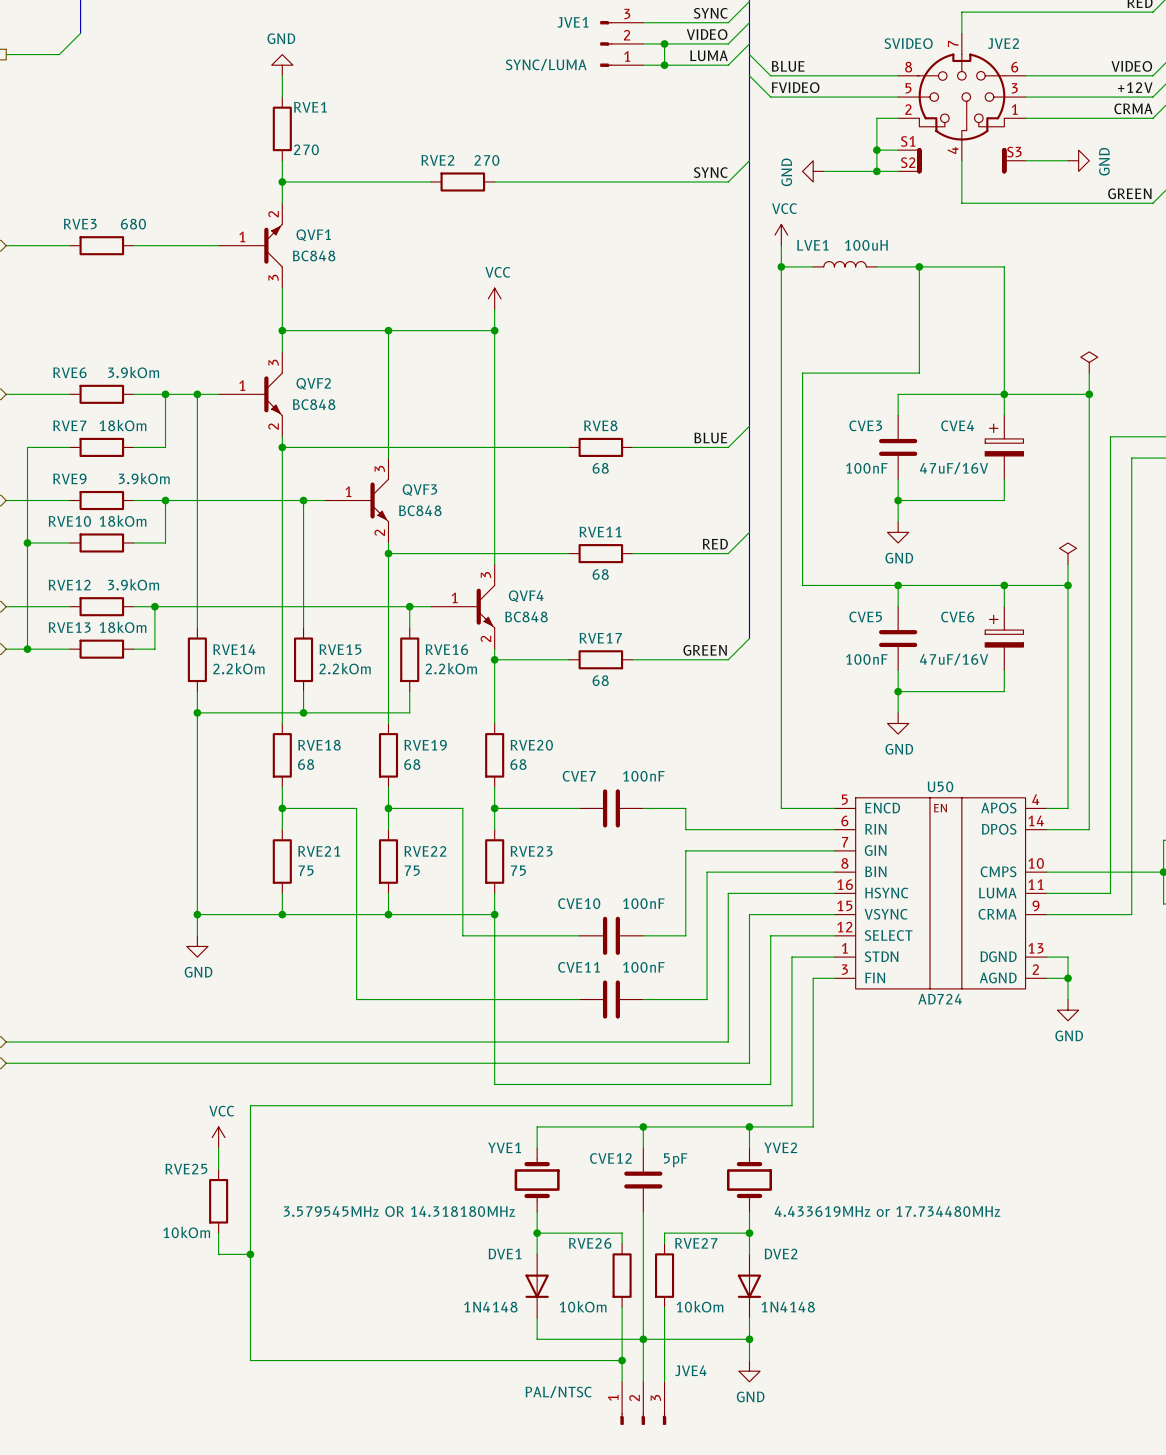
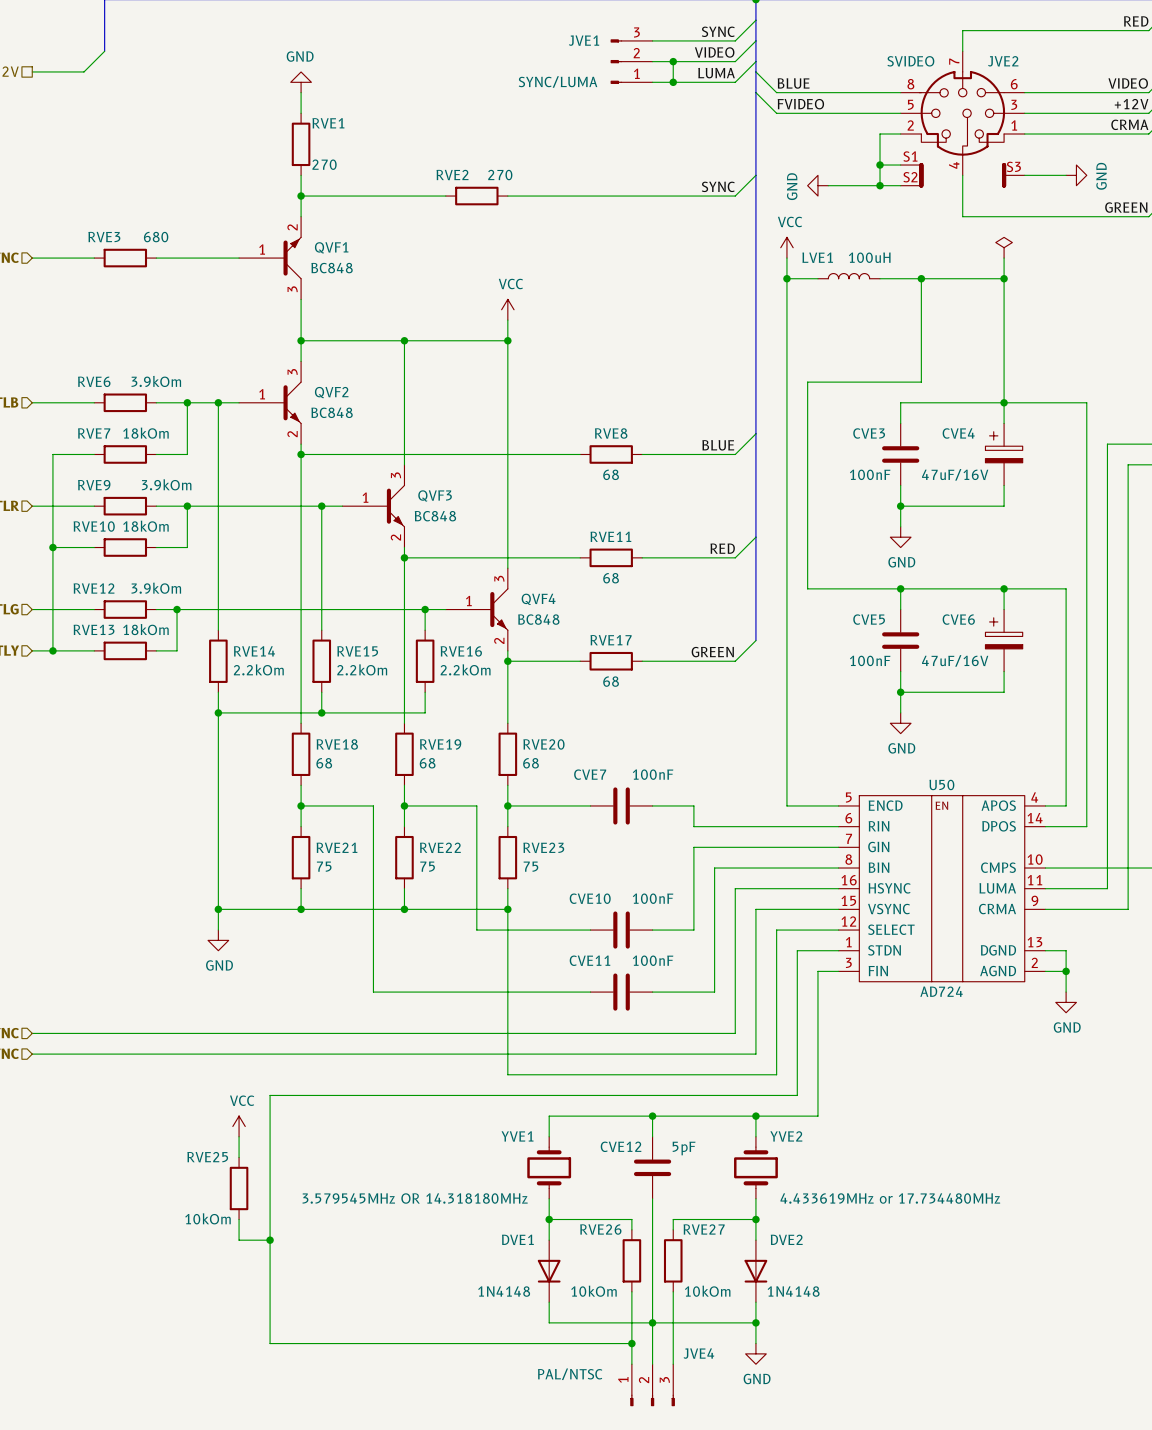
junction: none -> (1004, 278)
power symbol position: (1089, 362) -> (1004, 247)
wire: (1089, 373) (1089, 394) -> (1004, 258) (1004, 278)
junction: (1089, 394) -> none
power symbol: (1068, 553) -> none
wire: (1068, 564) (1068, 585) -> none
junction: (1068, 585) -> none

